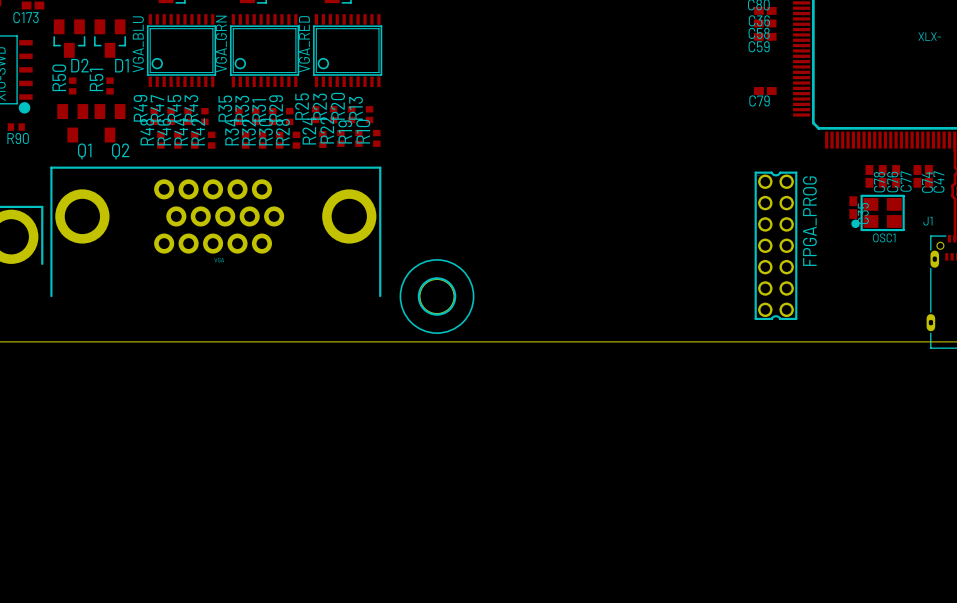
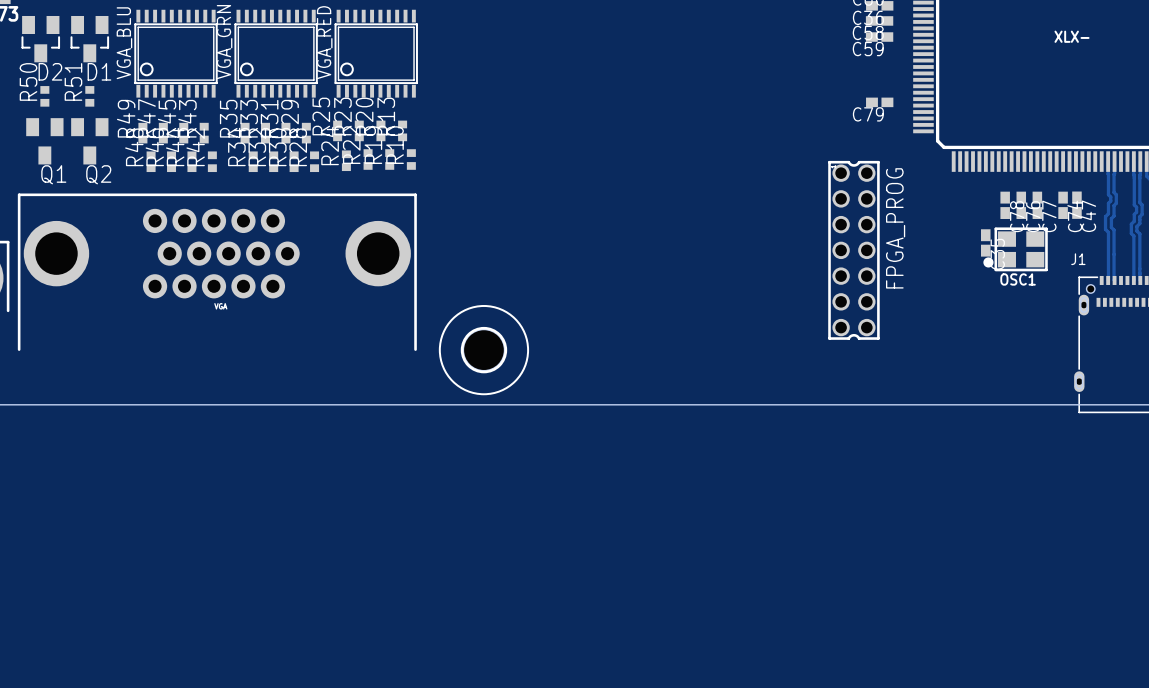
FPGA_PROG position: (775, 245) -> (853, 250)

